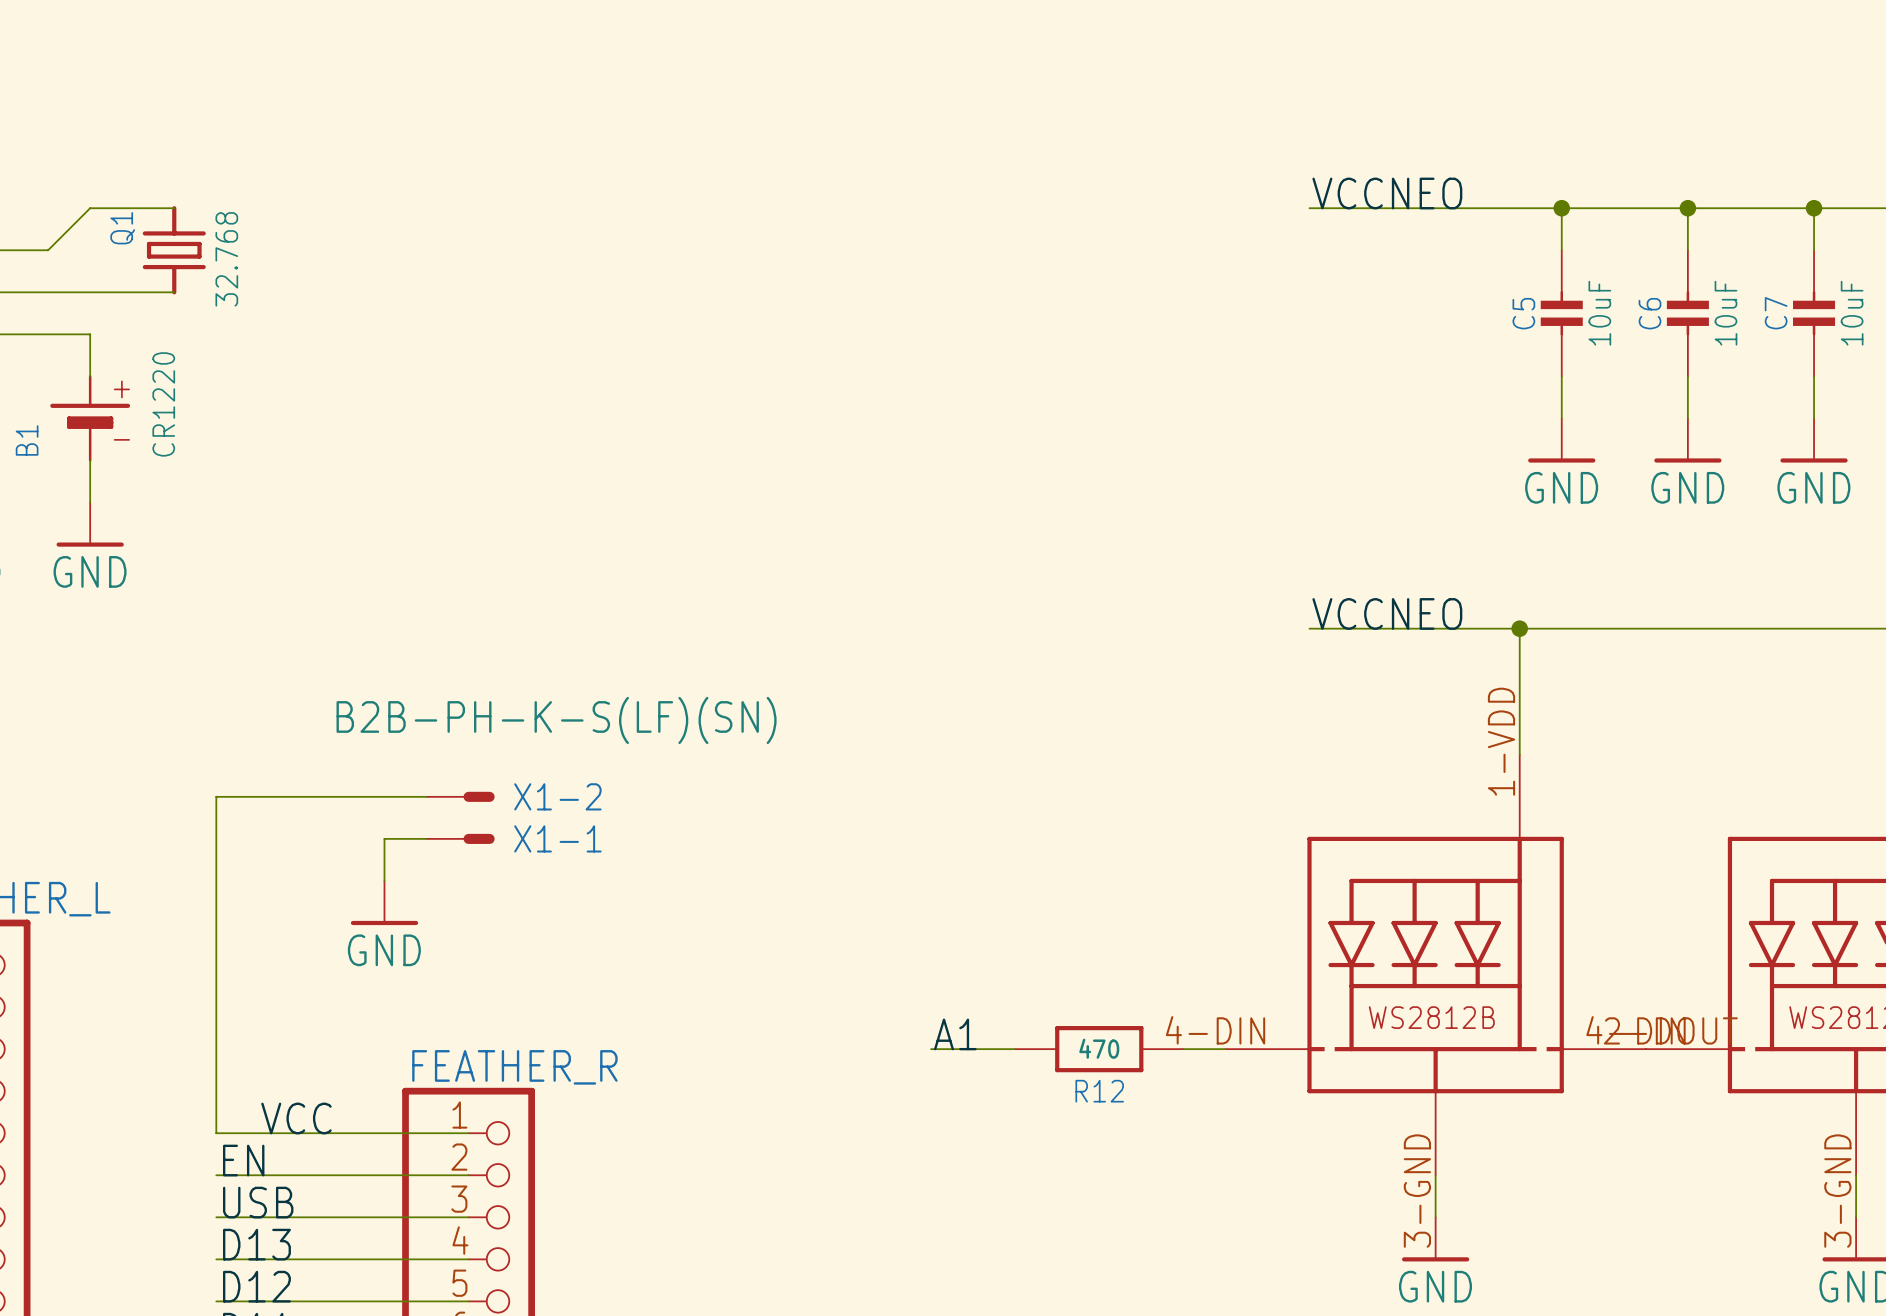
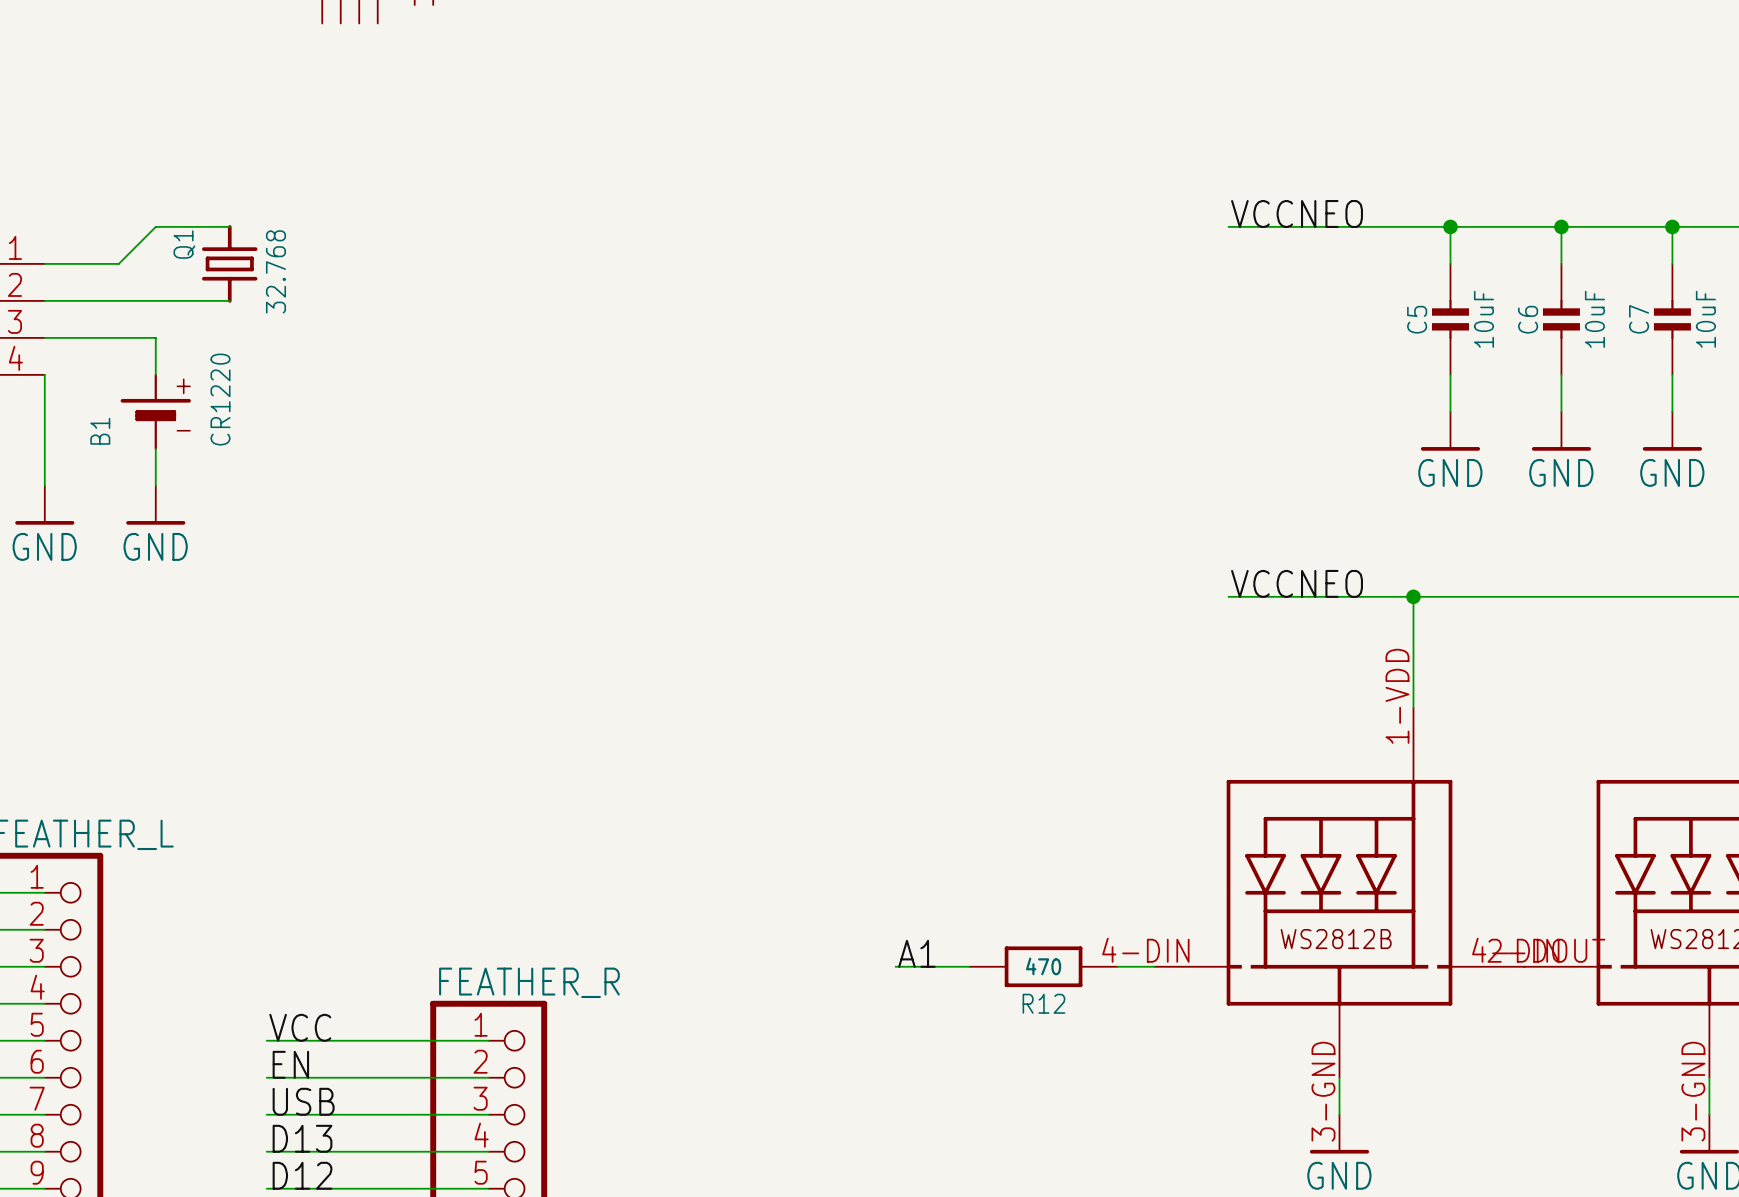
wire: (426, 796) (216, 796) (216, 1133) -> none
X1-2: (460, 796) -> none
wire: (426, 838) (384, 838) (384, 880) -> none
X1-1: B2B-PH-K-S(LF)(SN) (460, 838) -> none
power symbol: GND (384, 903) -> none
label position: VCC (296, 1118) -> VCC (300, 1027)

